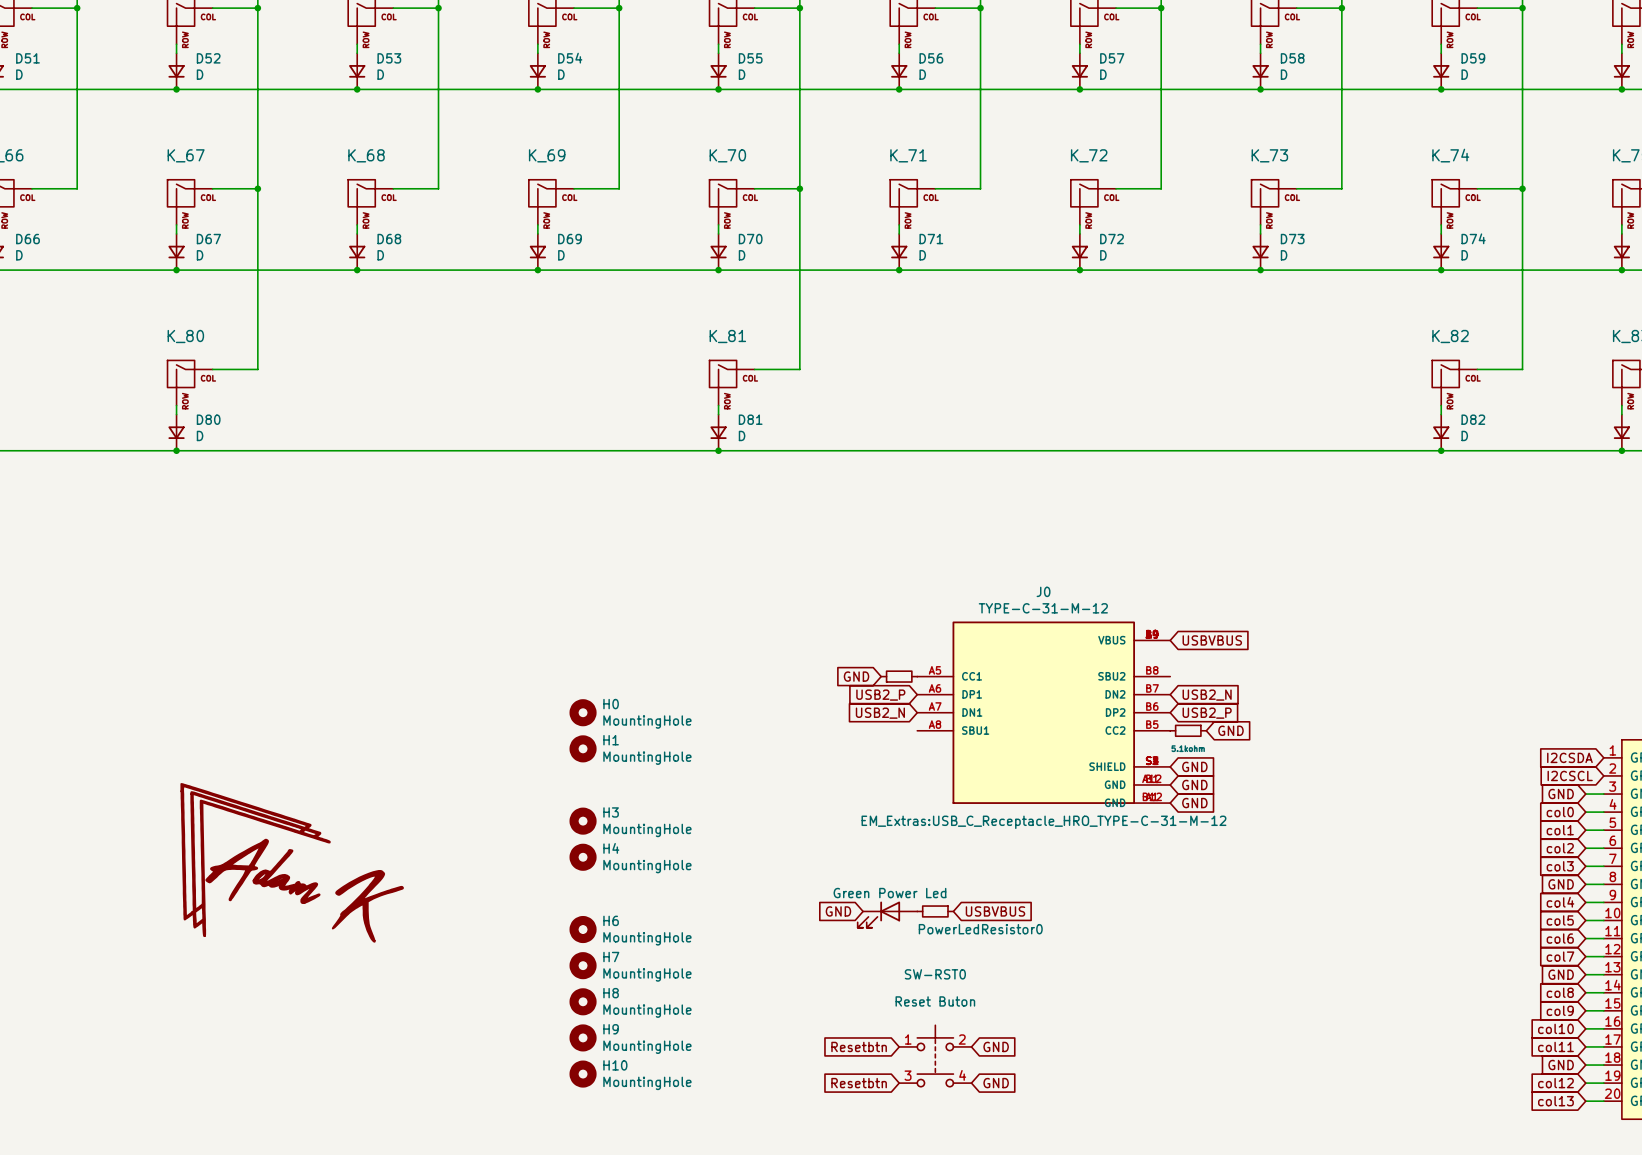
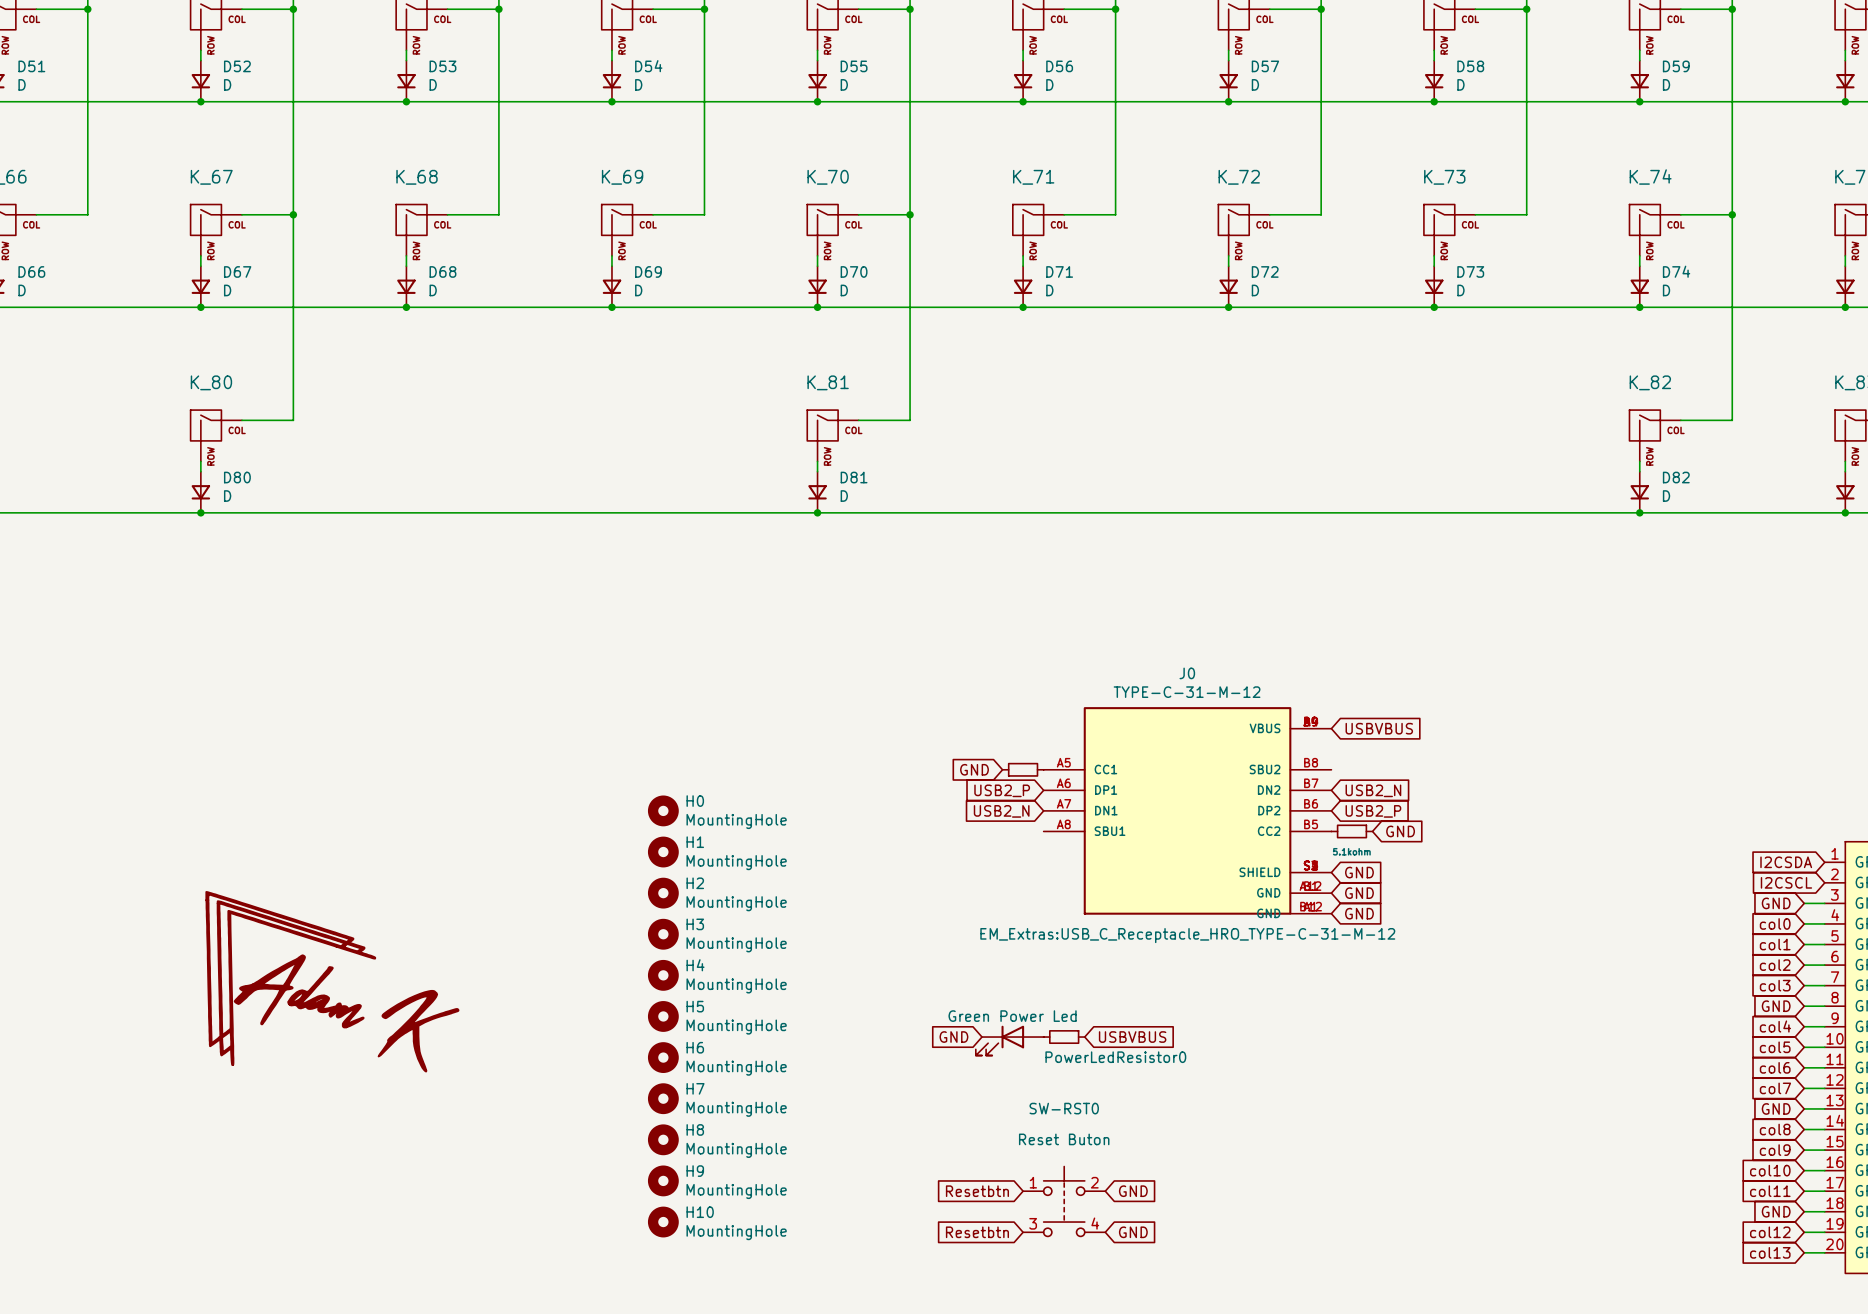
H2: none -> MountingHole (663, 893)
H5: none -> MountingHole (663, 1016)

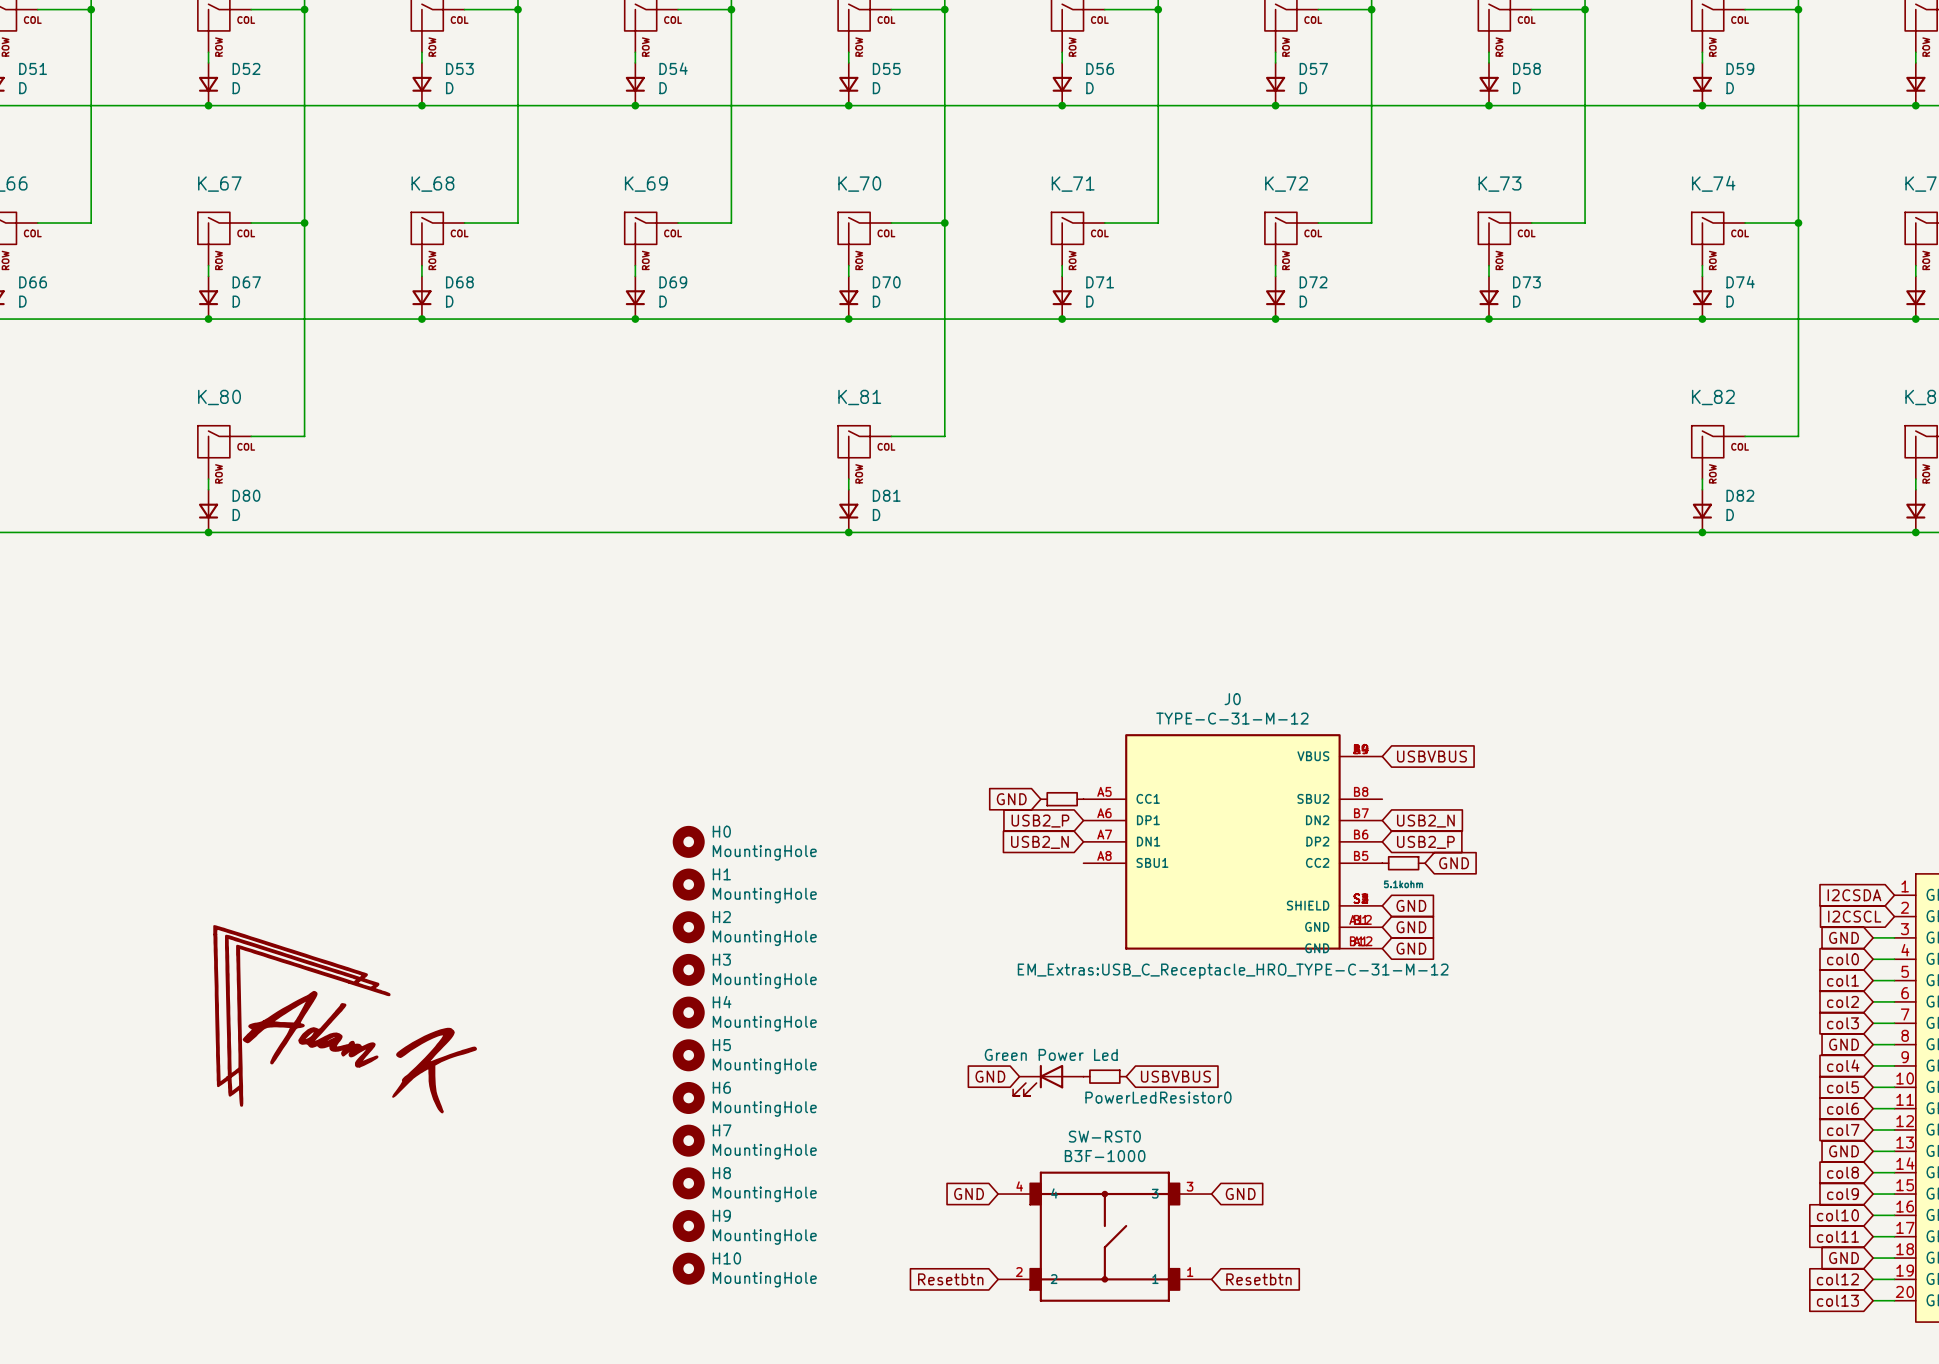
SW-RST0 value: Reset Buton (1064, 1139) -> B3F-1000 (1105, 1156)
global label: none -> GND (969, 1194)
global label: none -> GND (1240, 1194)
SW-RST0 symbol: [1023, 1166, 1106, 1237] -> [998, 1171, 1212, 1302]
global label: Resetbtn (977, 1191) -> none
global label: GND (1133, 1191) -> none
global label position: Resetbtn (977, 1232) -> Resetbtn (950, 1279)
global label: GND (1133, 1232) -> none
global label: none -> Resetbtn (1258, 1279)

